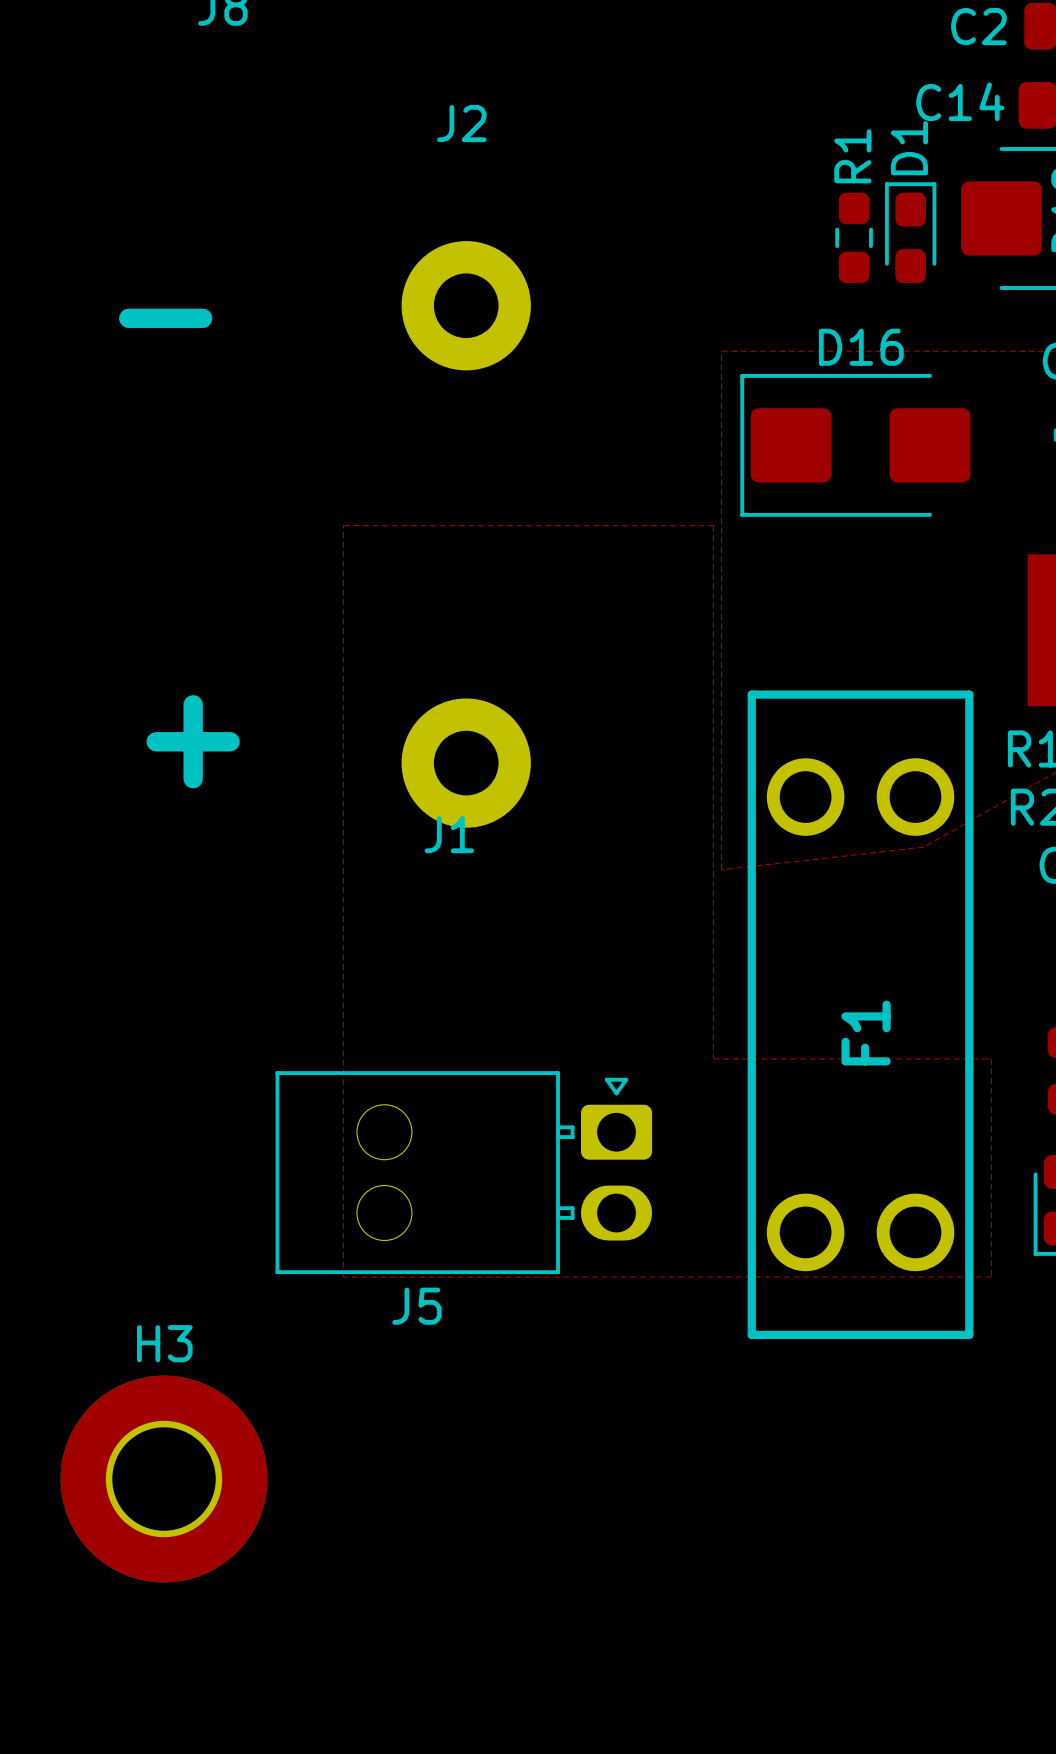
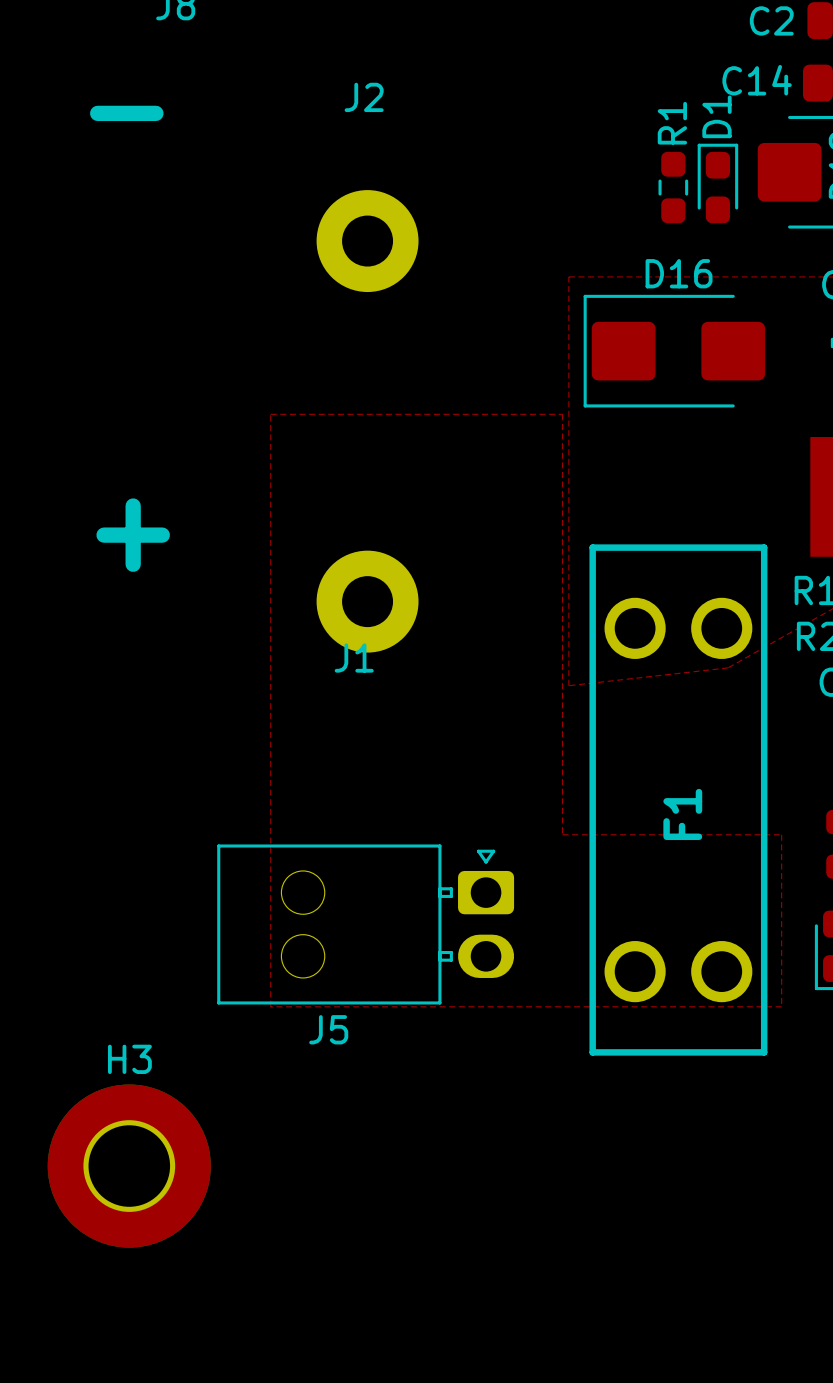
text position: - (165, 318) -> - (126, 113)
text position: + (193, 741) -> + (133, 535)

